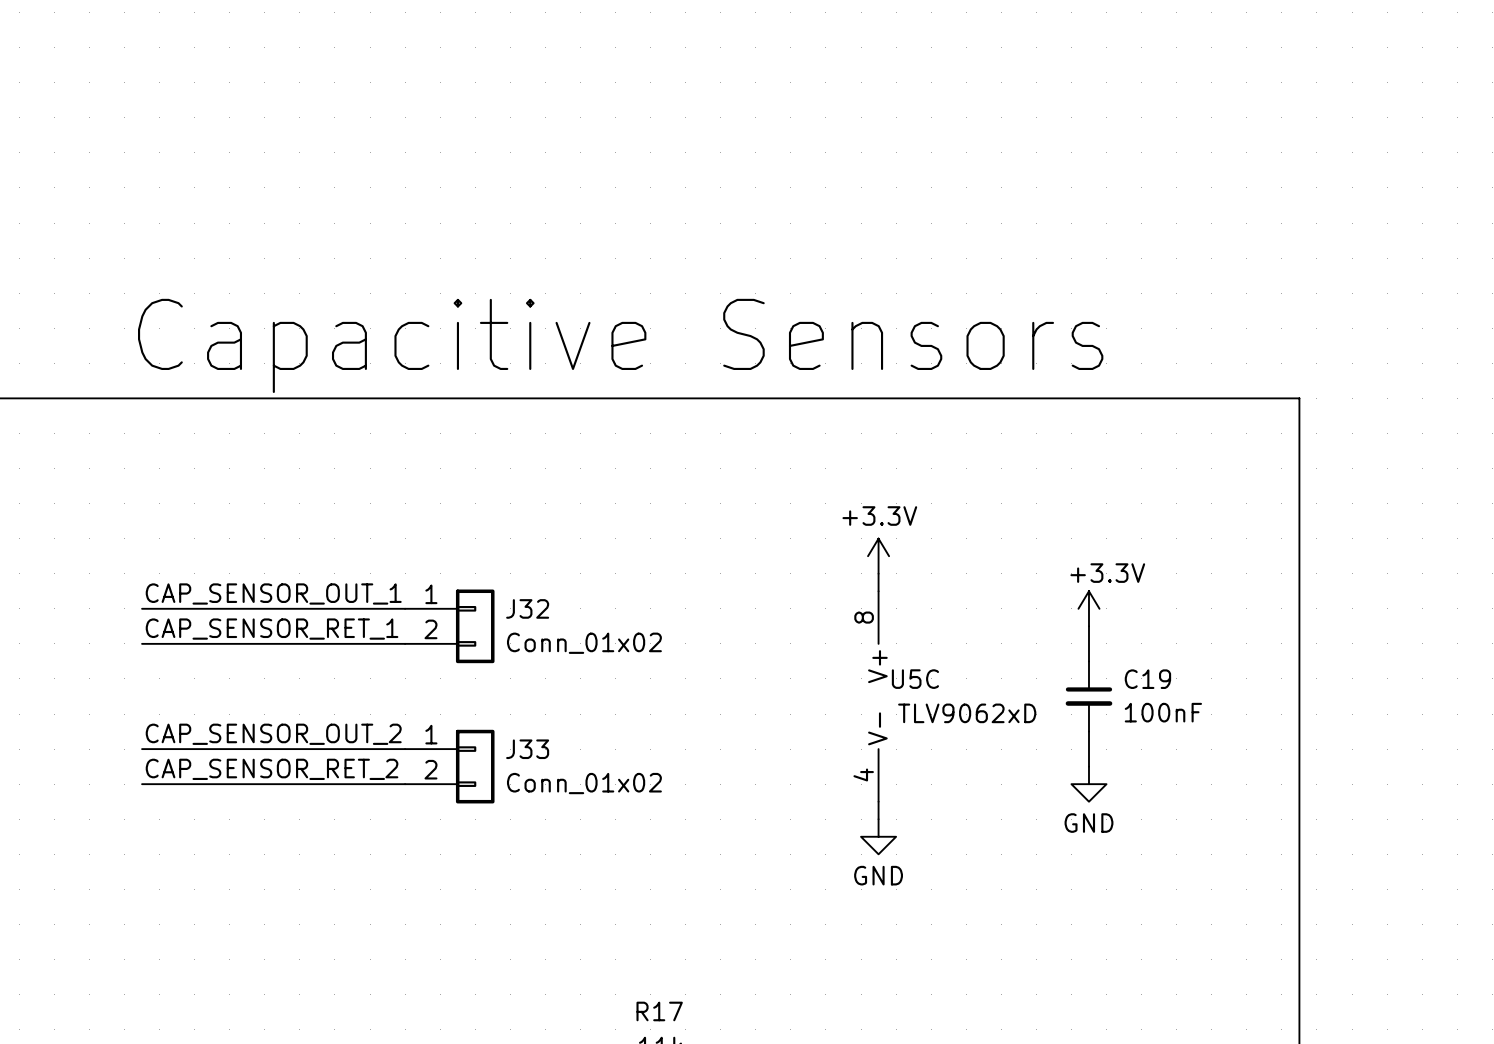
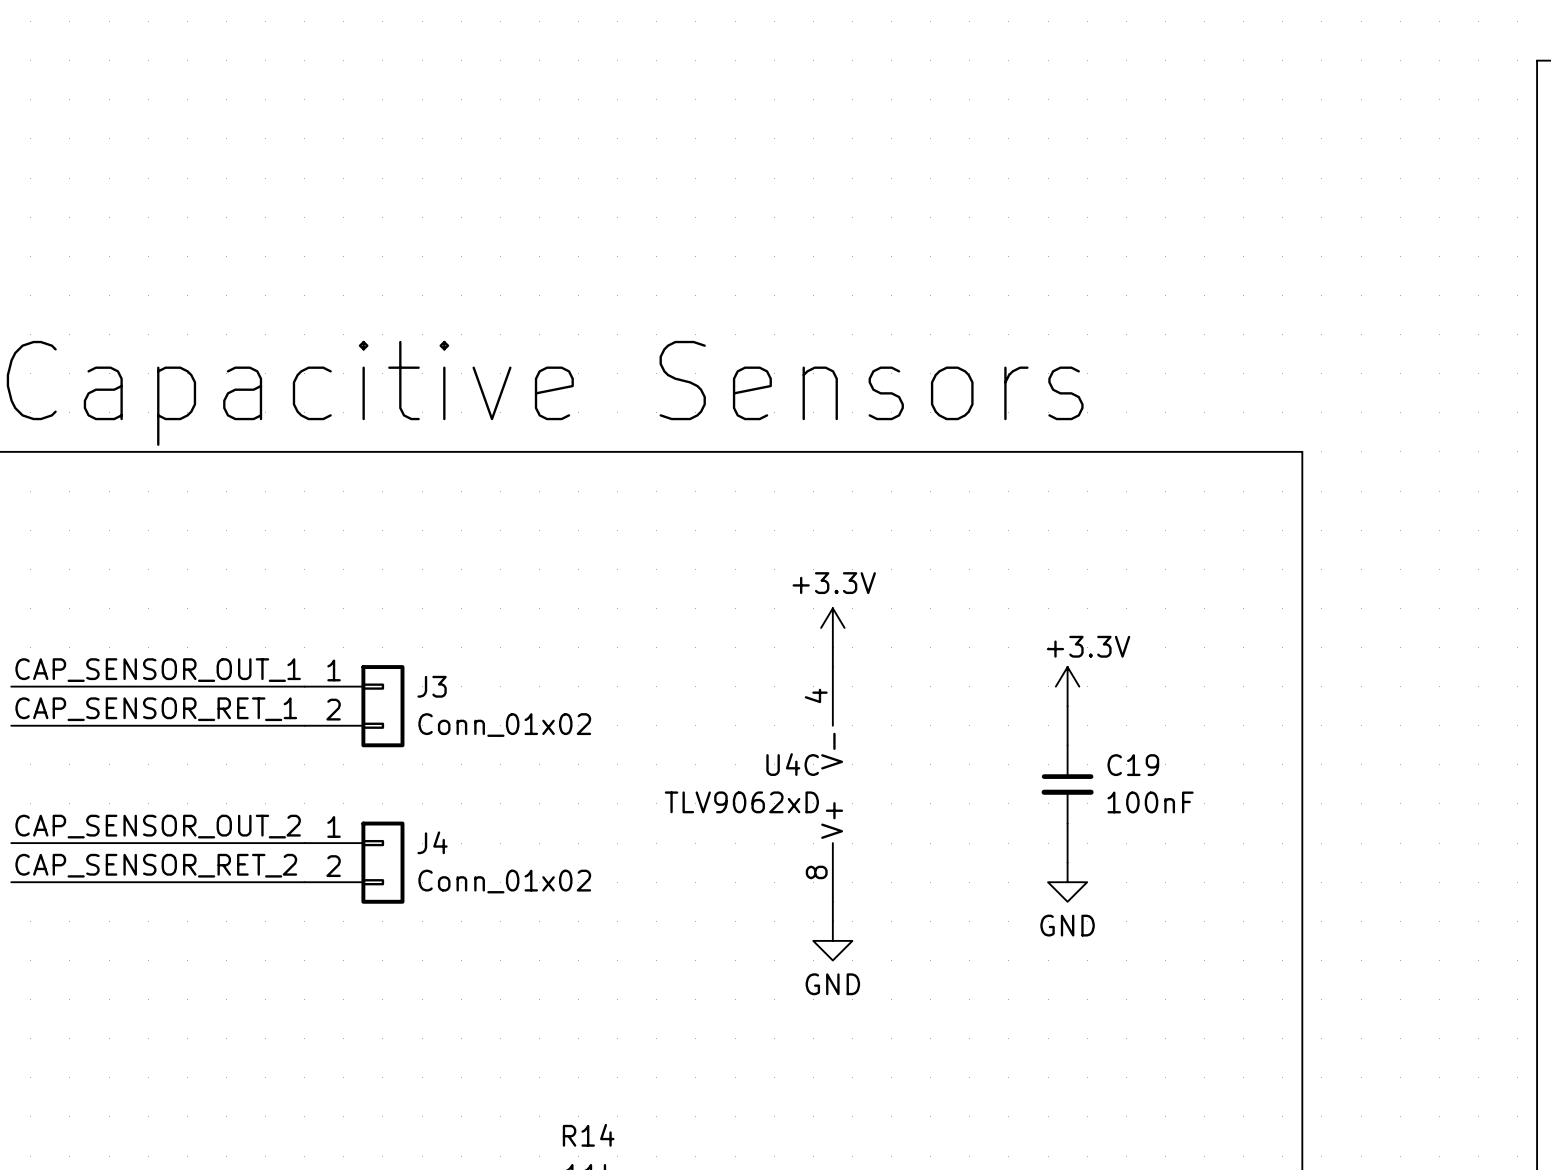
J32 name: J32 (527, 608) -> J3 (432, 686)
U5C name: U5C (915, 679) -> U4C (792, 764)
U5C rotation: 0° (878, 696) -> 180° (832, 784)
U5C value position: TLV9062xD (967, 713) -> TLV9062xD (741, 802)
J33 name: J33 (527, 749) -> J4 (432, 842)
R17 name: R17 (659, 1011) -> R14 (588, 1135)

